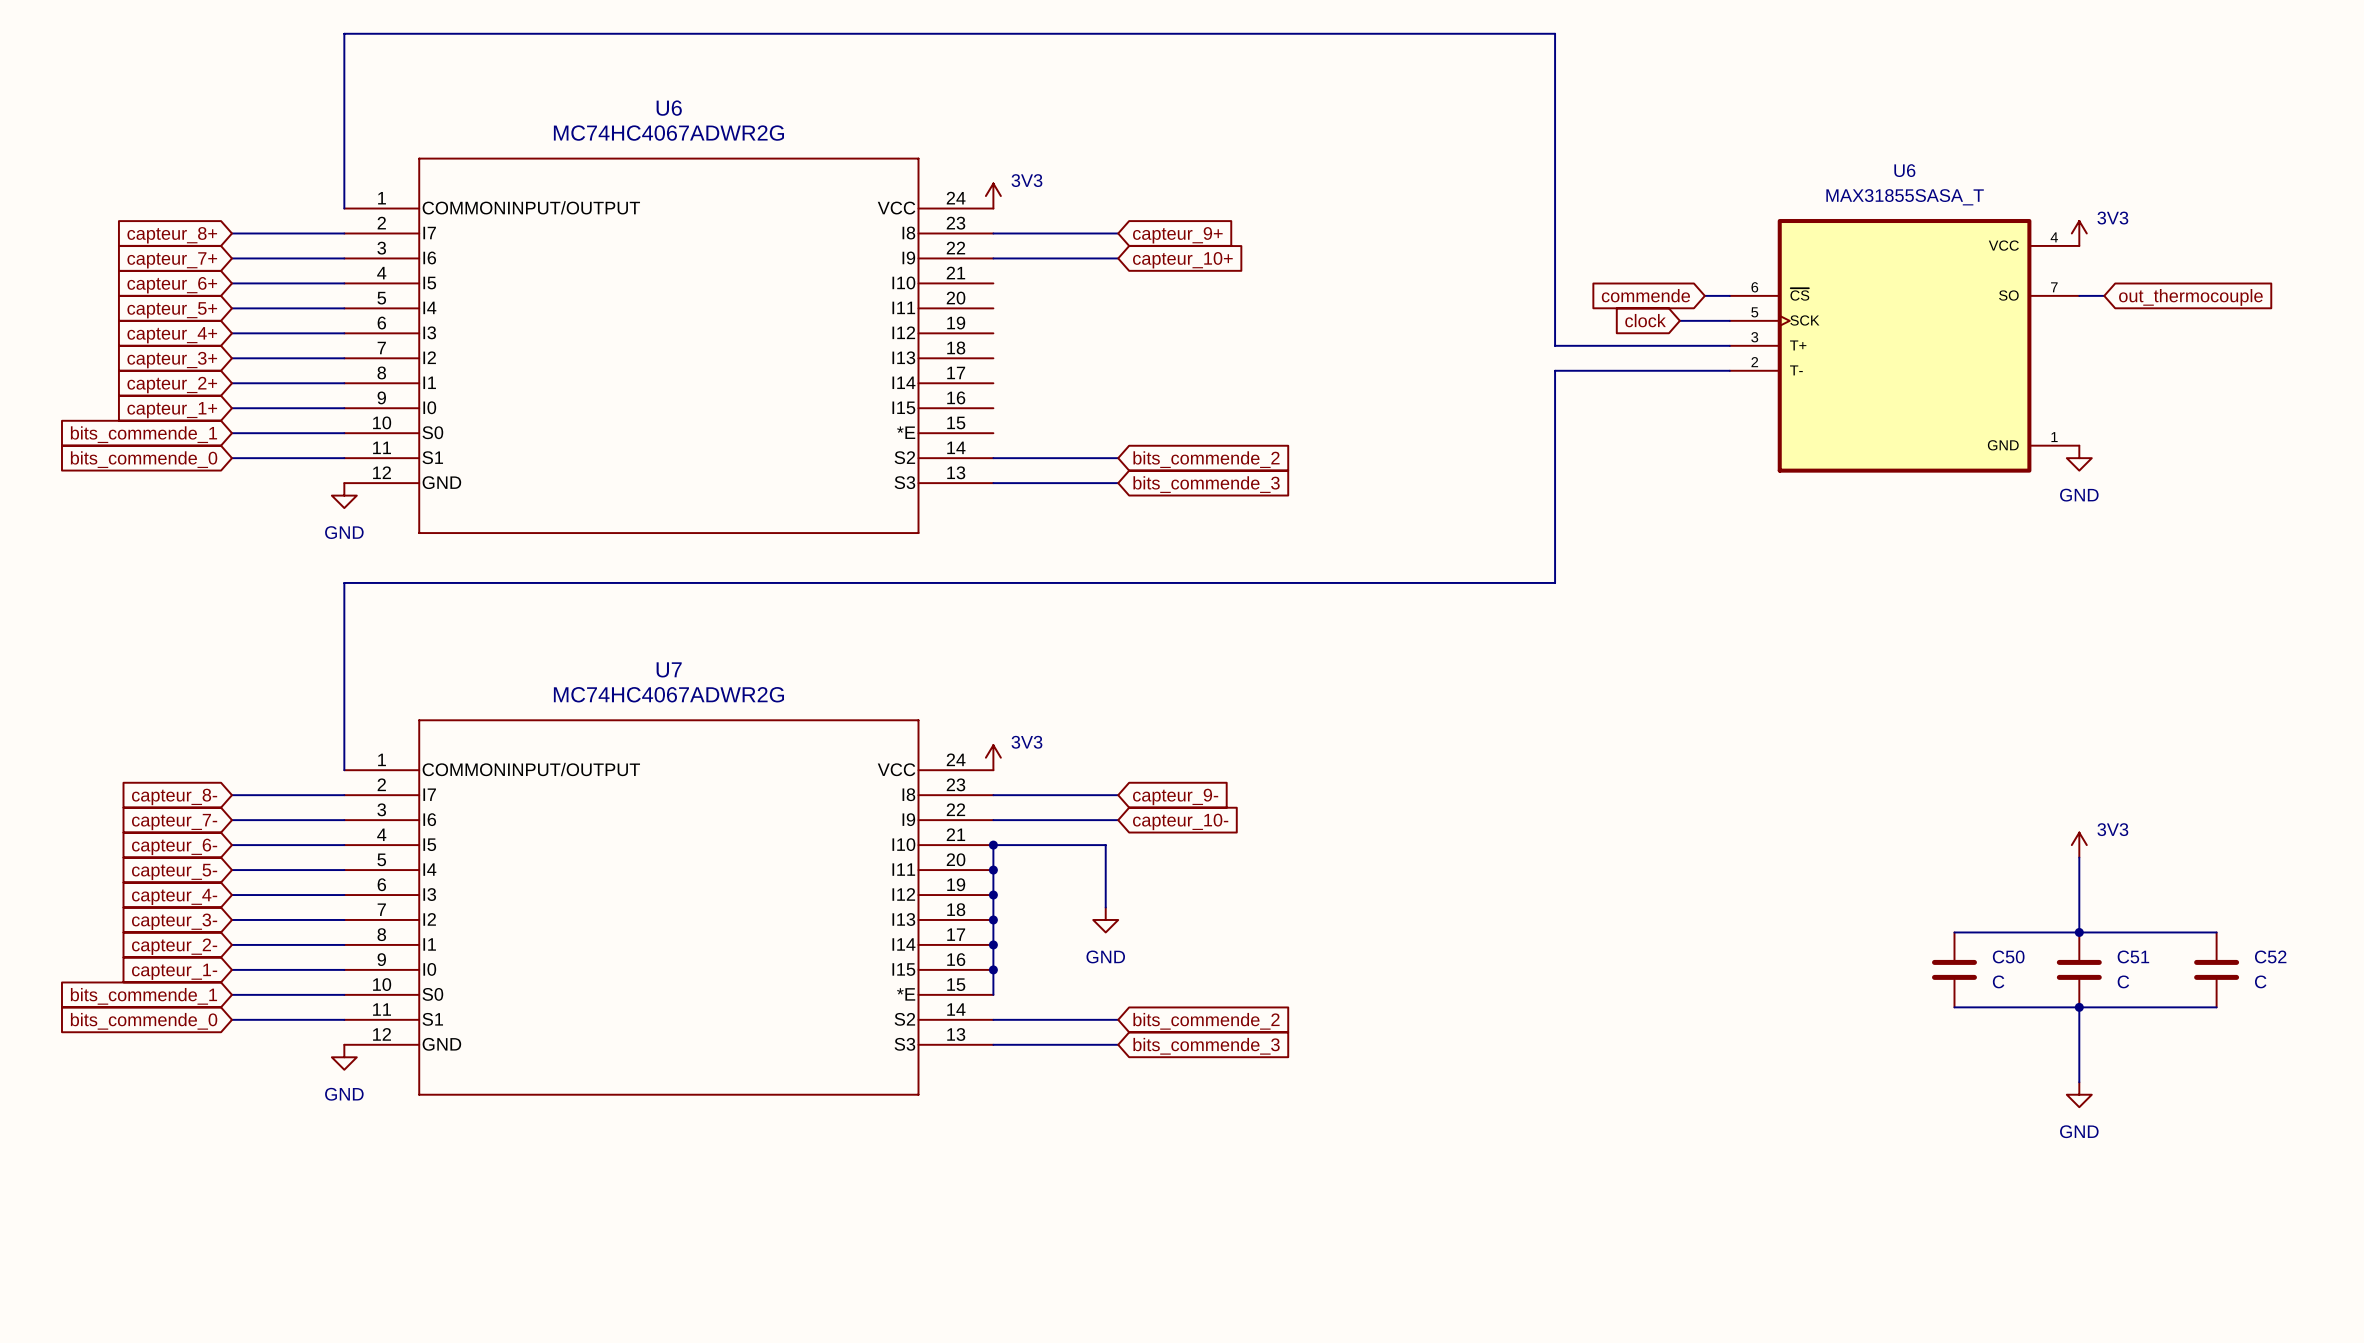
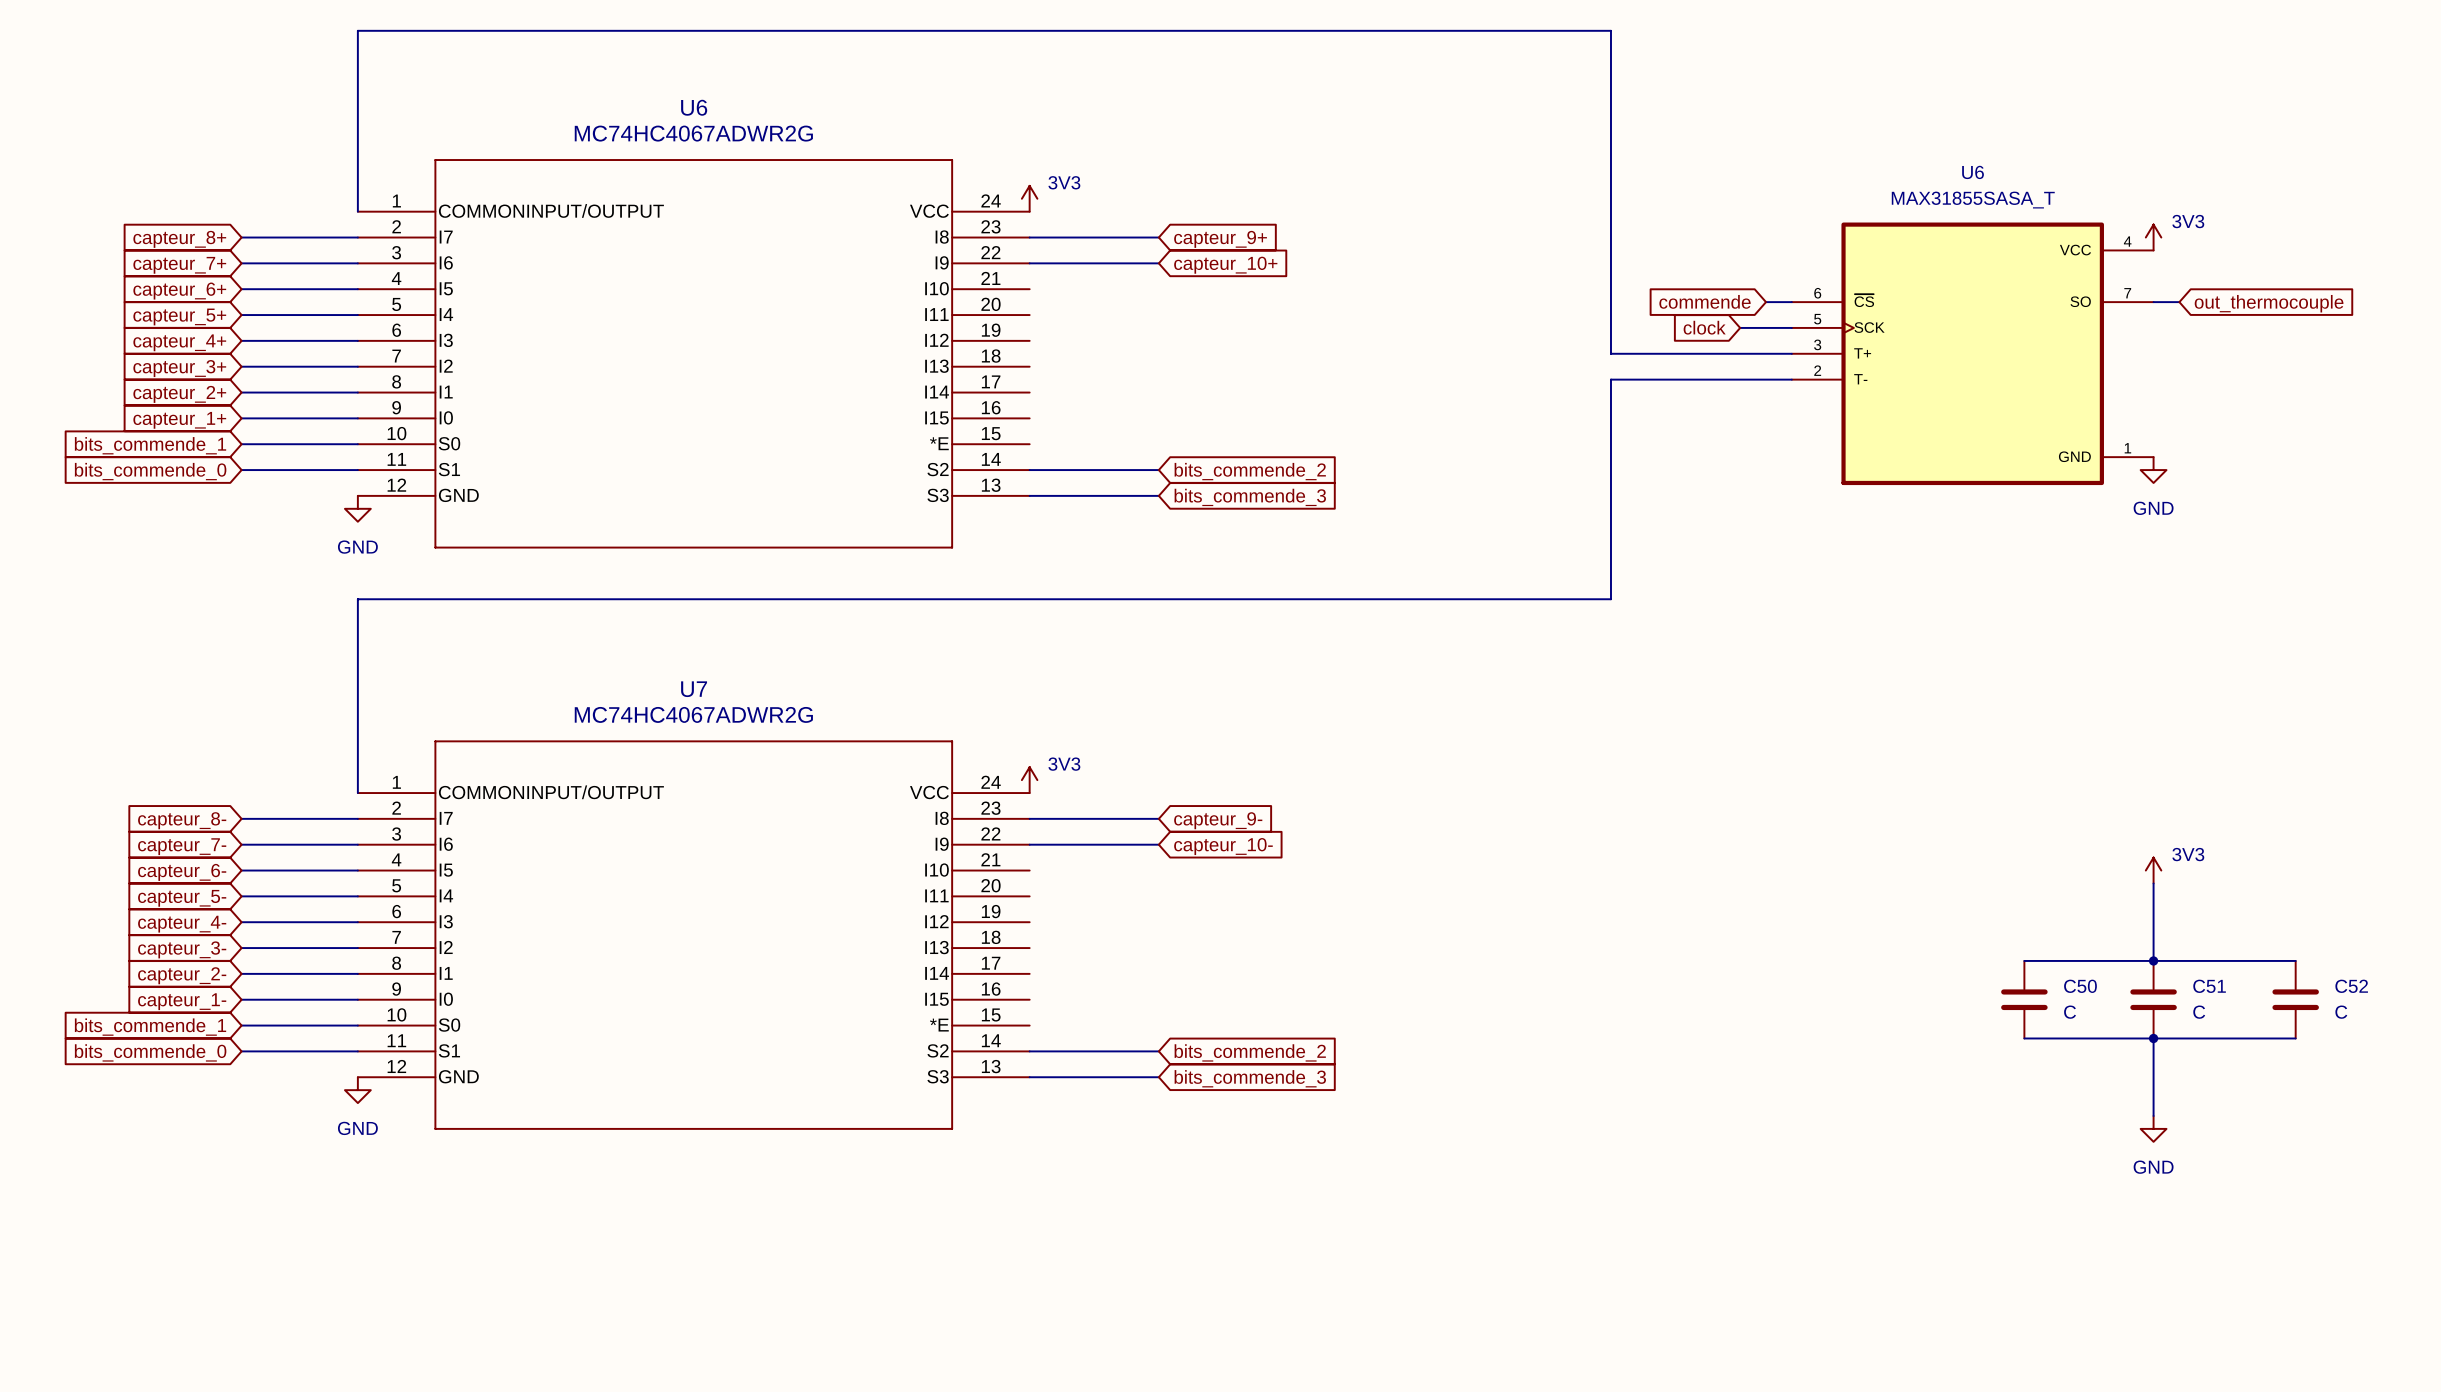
junction: (993, 845) -> none
junction: (993, 870) -> none
junction: (993, 895) -> none
wire: (1105, 907) (1105, 845) (993, 845) (993, 994) -> none
junction: (993, 919) -> none
power symbol: GND (1105, 919) -> none
junction: (993, 944) -> none
junction: (993, 969) -> none

